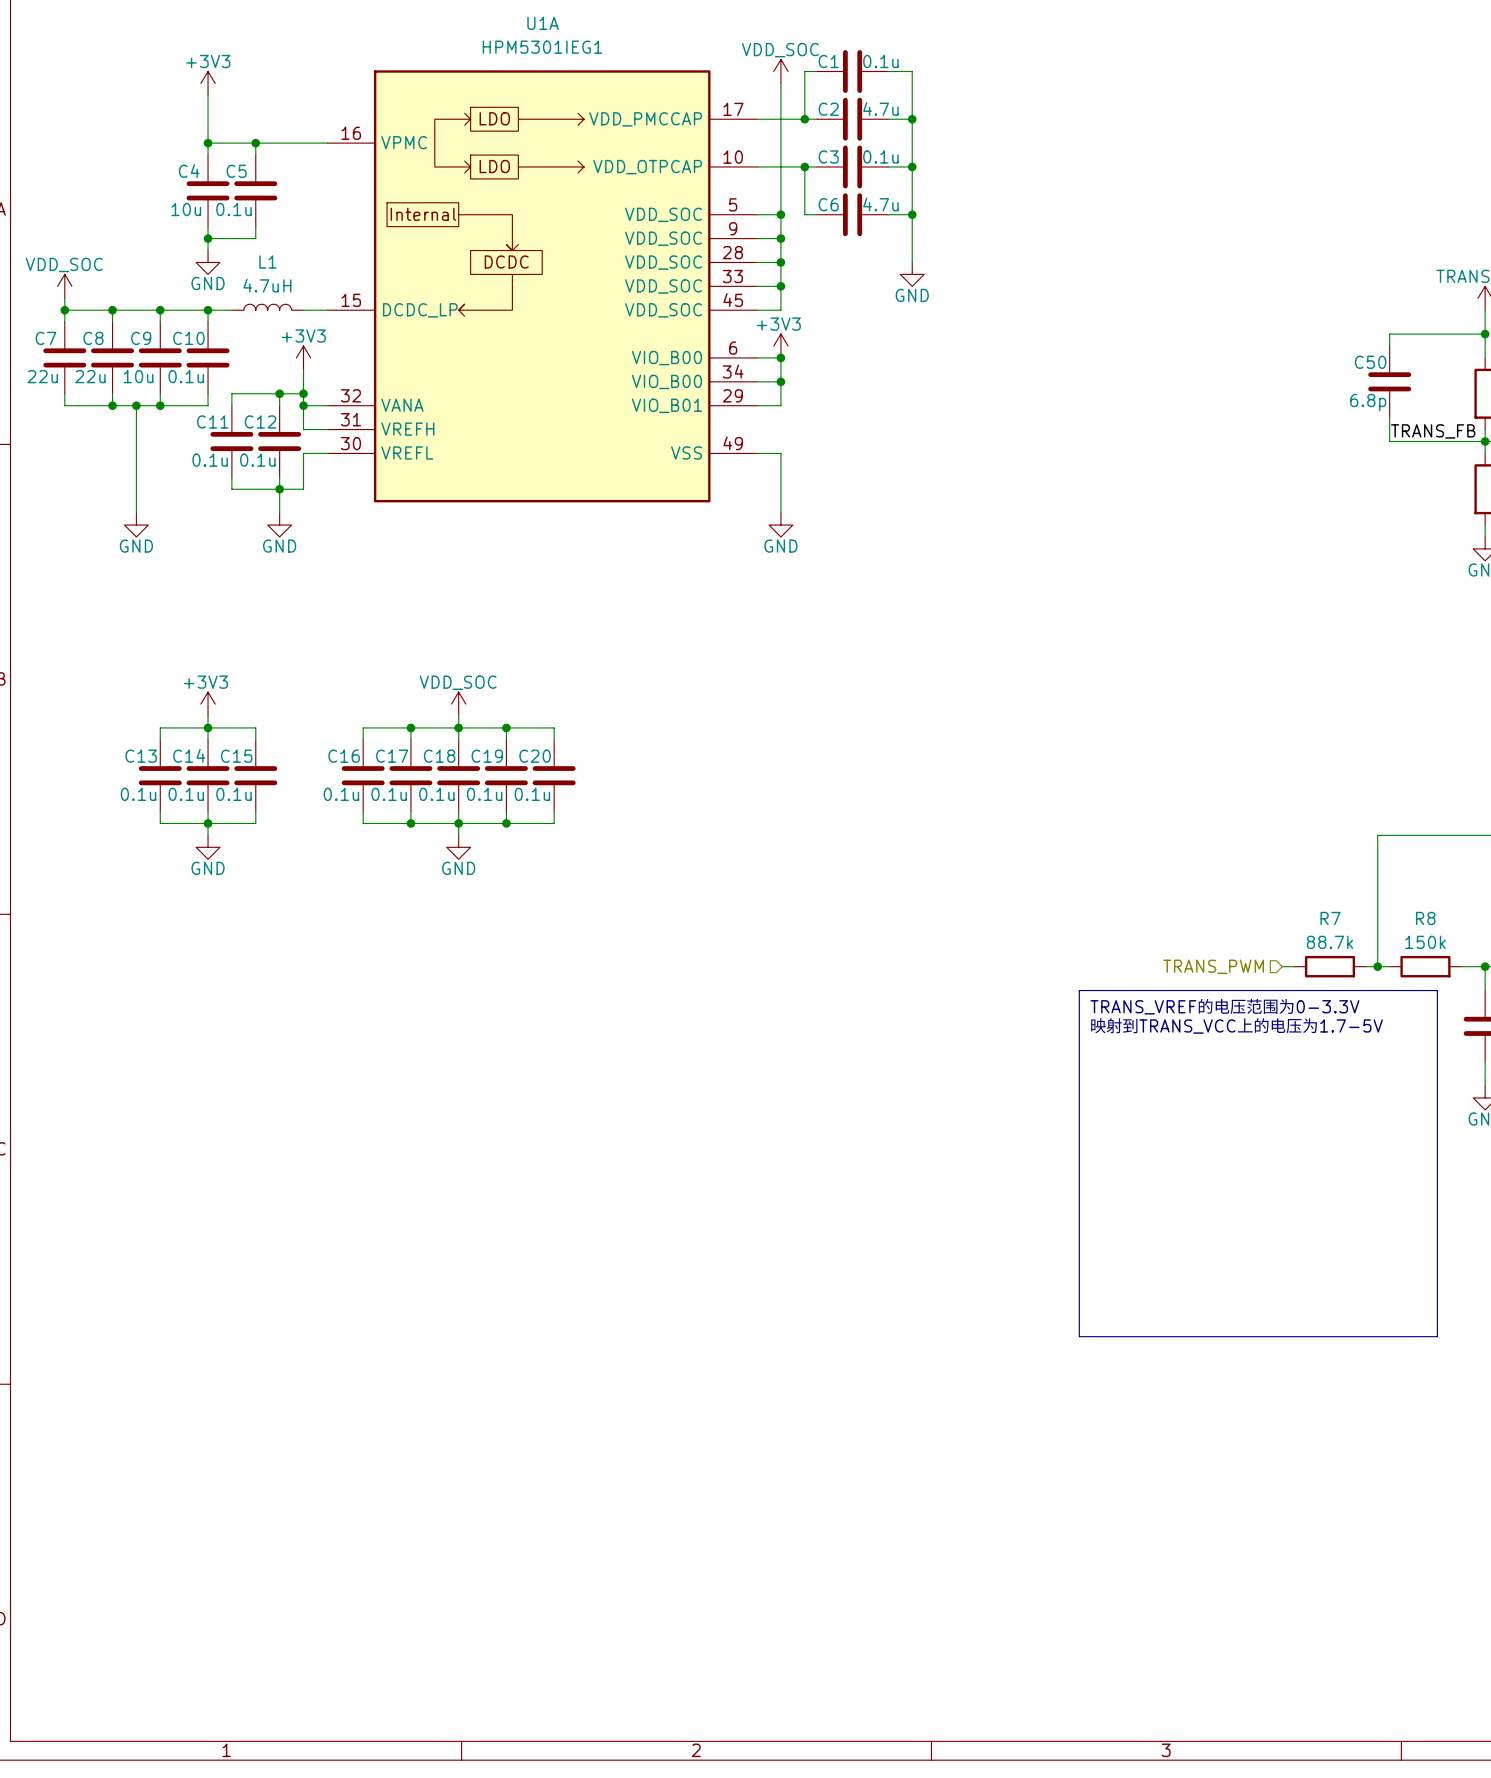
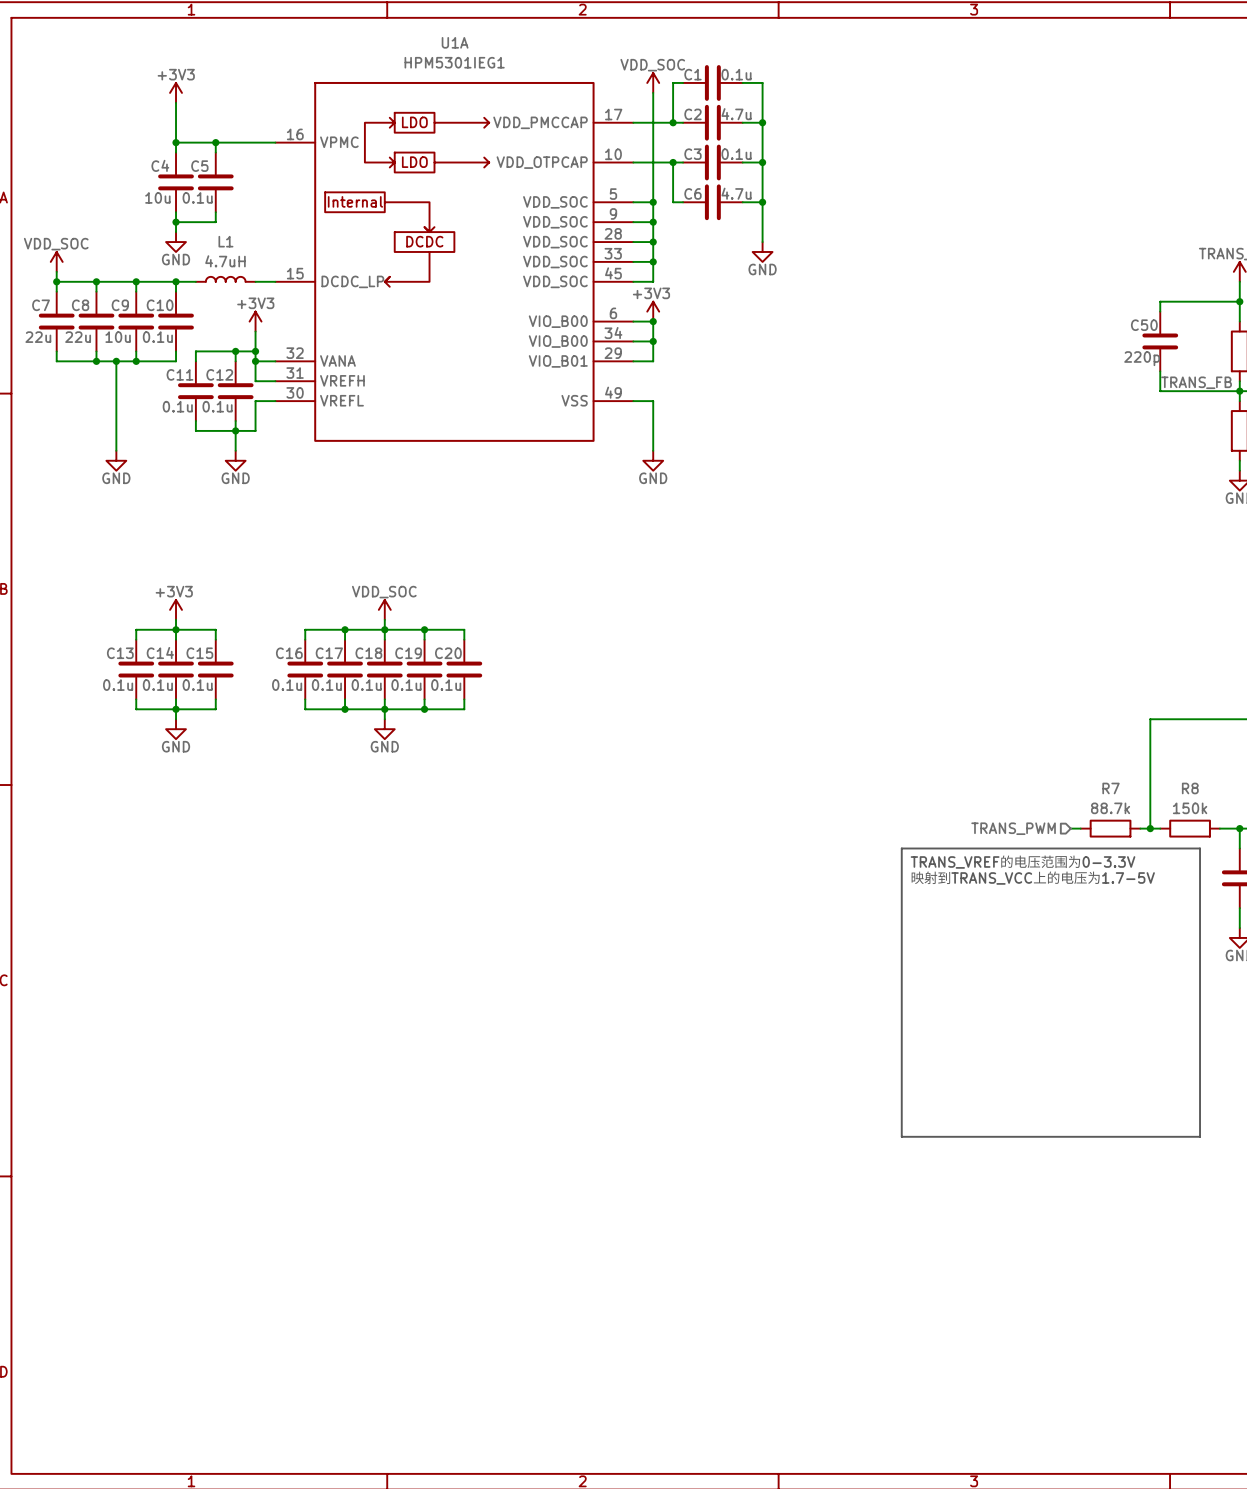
C50 value: 6.8p (1368, 402) -> 220p (1142, 358)

